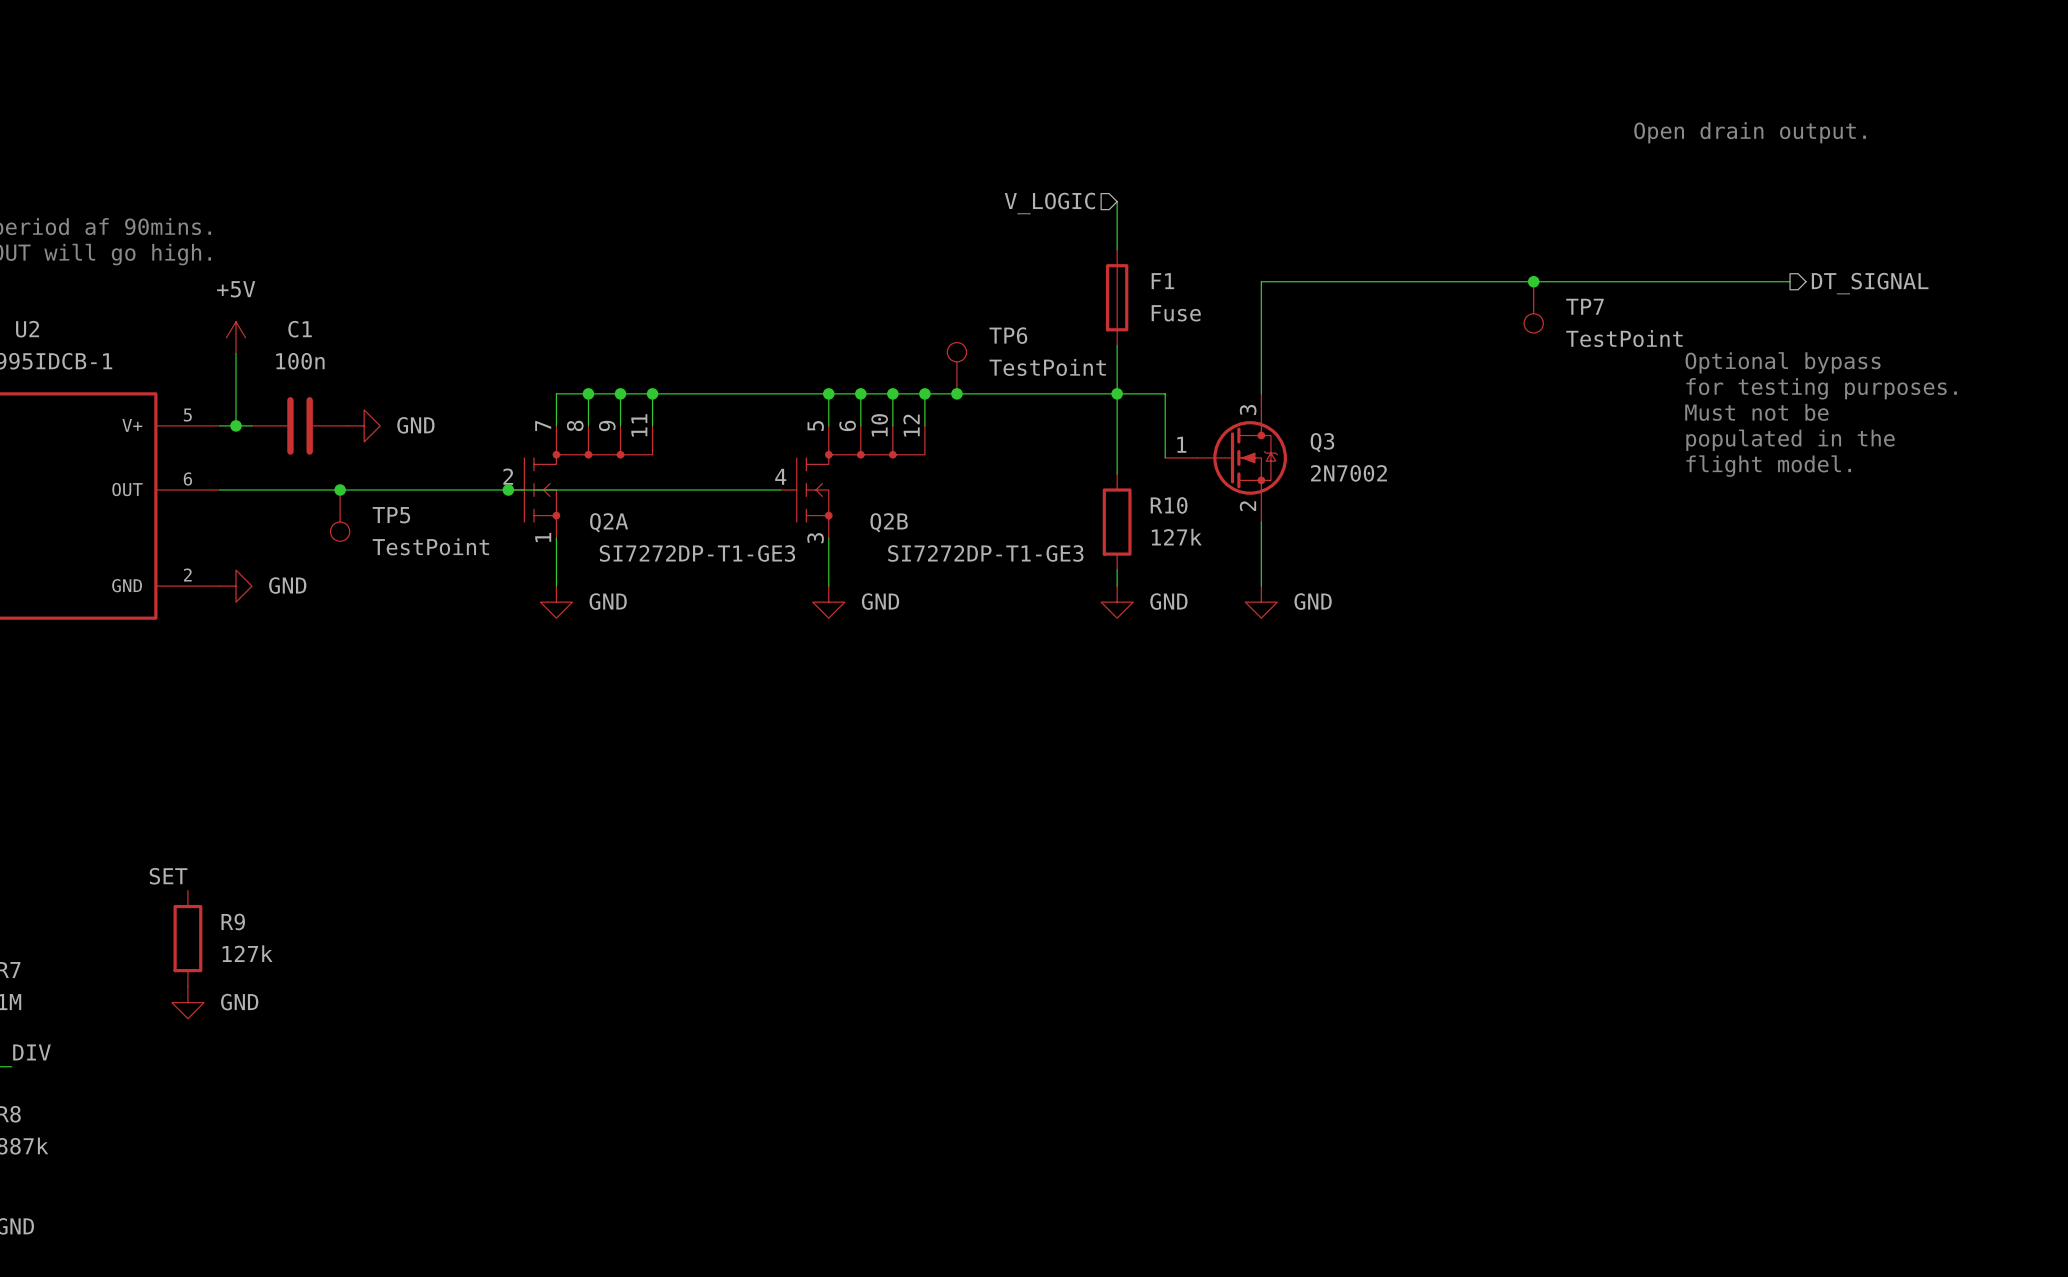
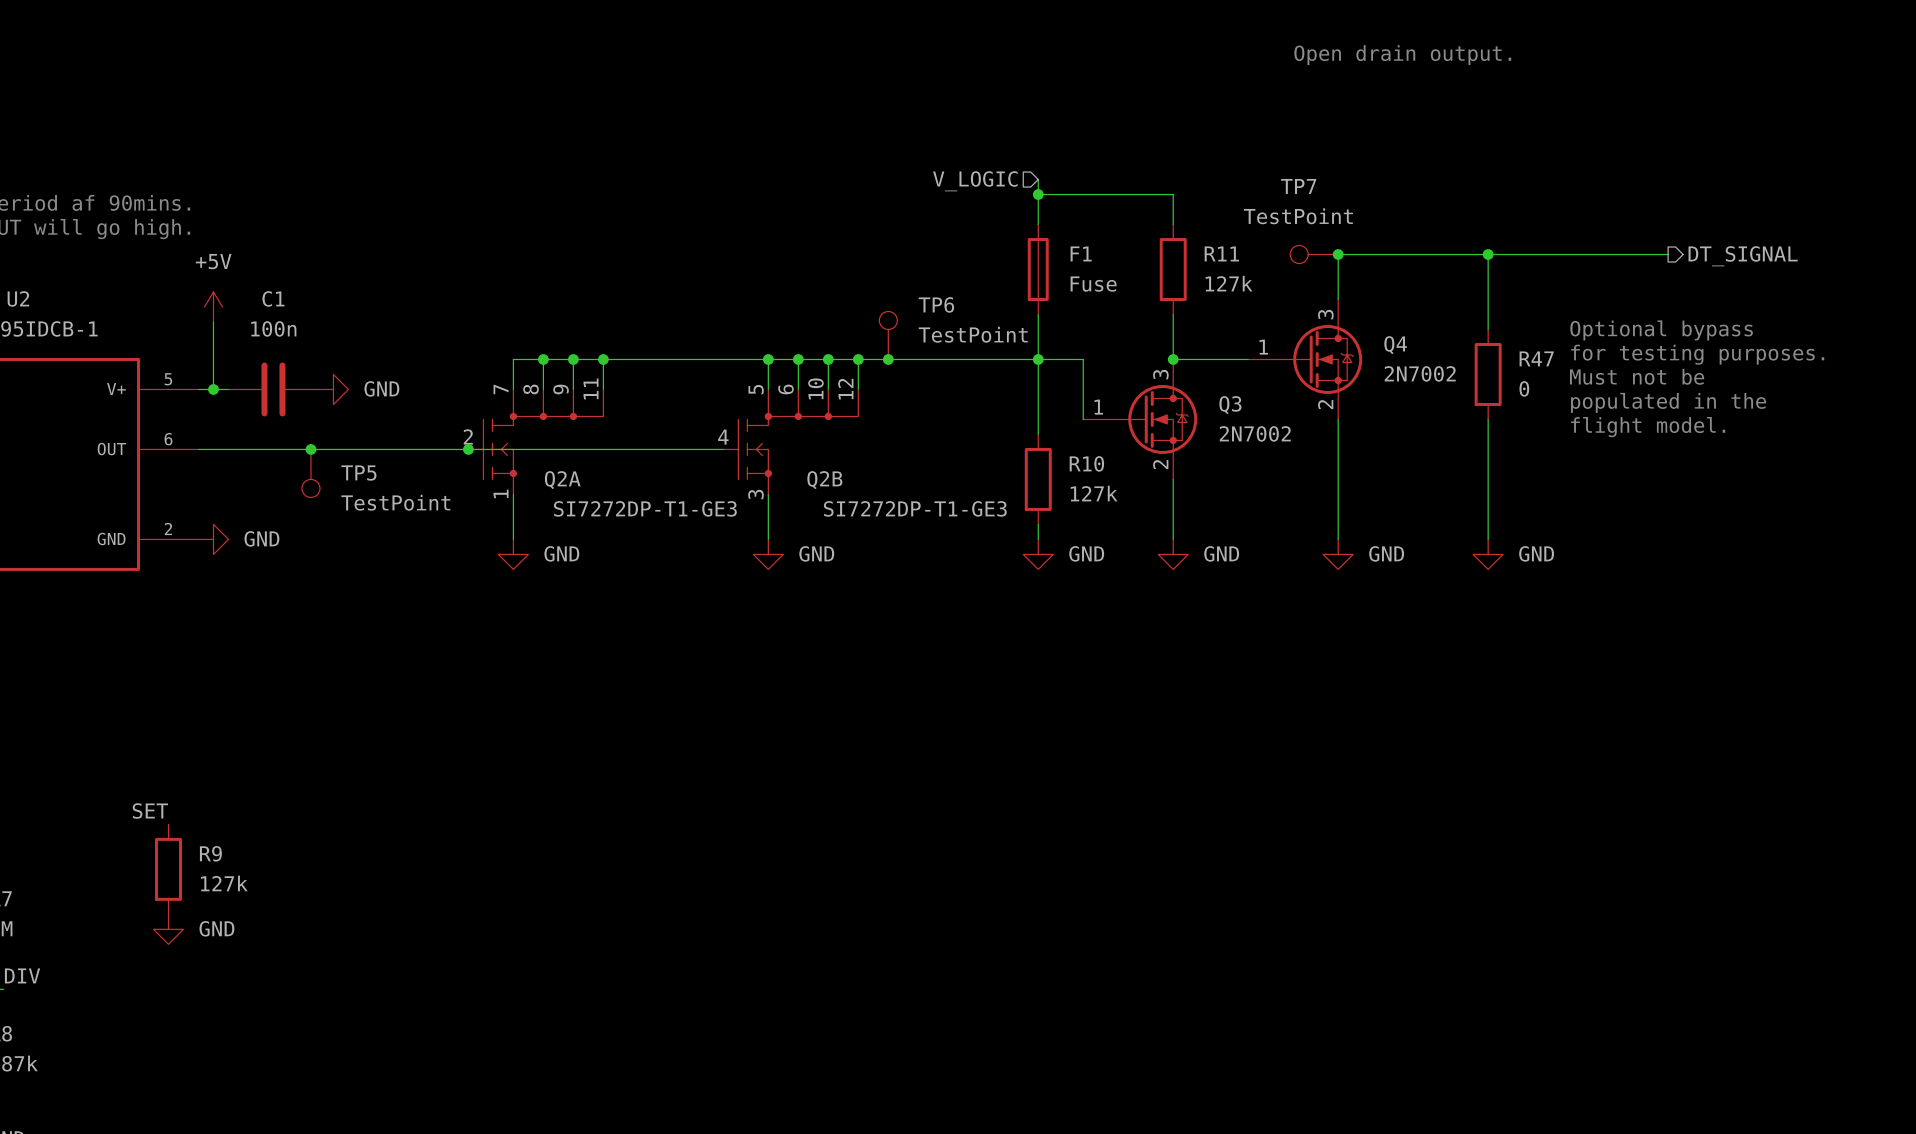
text position: Open drain output. (1750, 132) -> Open drain output. (1402, 55)
wire: none -> (1038, 194) (1173, 194) (1173, 224)
junction: none -> (1038, 194)
wire: (1437, 281) (1261, 281) (1261, 345) -> (1338, 254) (1338, 299)
junction: none -> (1338, 254)
junction: (1533, 281) -> none
wire: none -> (1488, 254) (1488, 329)
junction: none -> (1488, 254)
R11: none -> 127k (1173, 269)
TP7 name position: TP7 (1585, 306) -> TP7 (1298, 186)
TP7 position: (1533, 307) -> (1314, 254)
TP7 rotation: 0° (1533, 323) -> 90° clockwise (1299, 254)
TP7 value position: TestPoint (1624, 338) -> TestPoint (1298, 216)
wire: none -> (1173, 359) (1248, 359)
junction: none -> (1173, 359)
Q4: none -> 2N7002 (1305, 359)
R47: none -> 0 (1488, 374)
wire: none -> (1338, 419) (1338, 539)
wire: none -> (1488, 419) (1488, 539)
power symbol: none -> GND (1338, 554)
power symbol: none -> GND (1488, 554)

